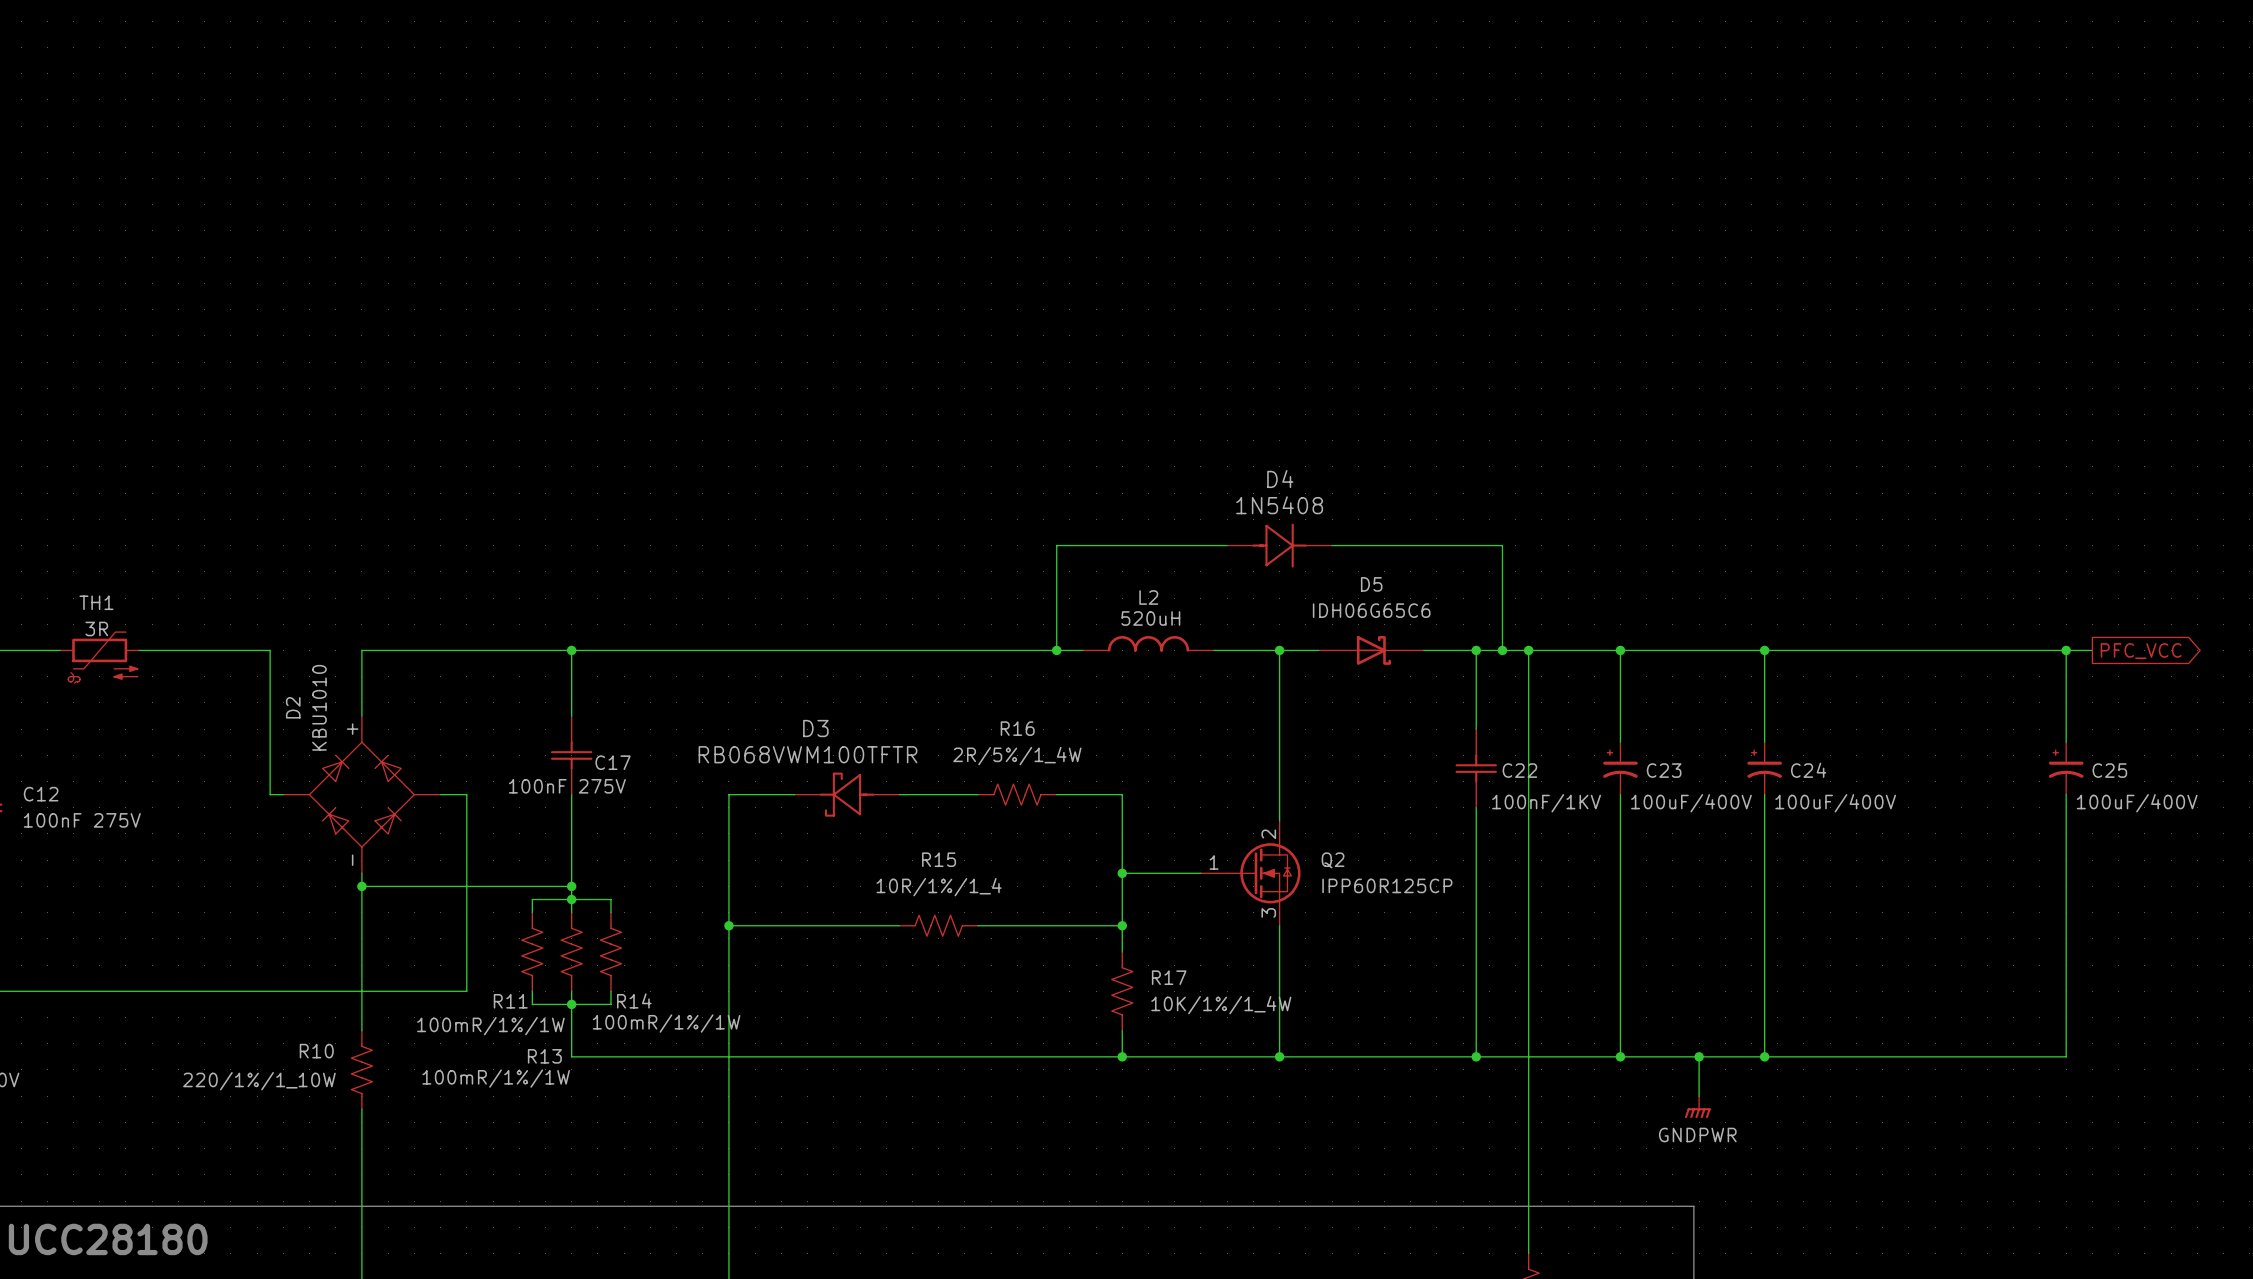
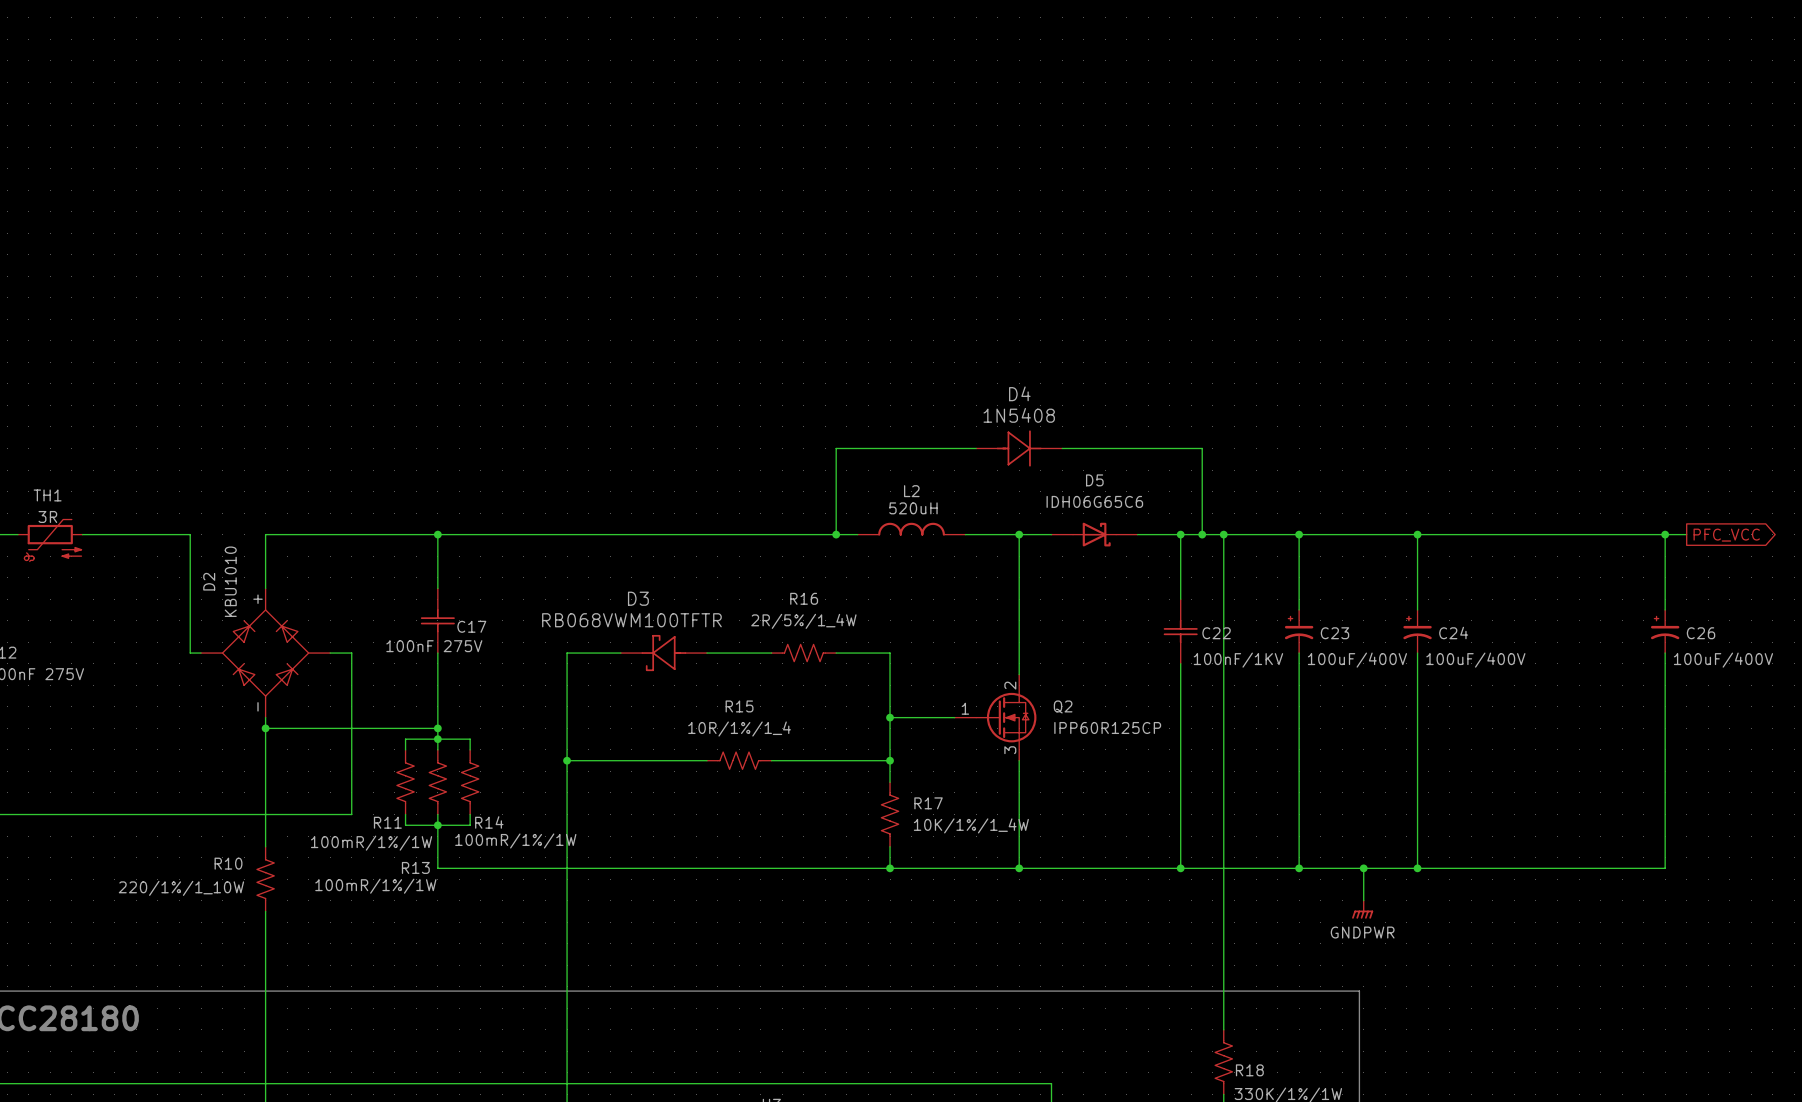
C25 name: C25 (2109, 770) -> C26 (1701, 633)

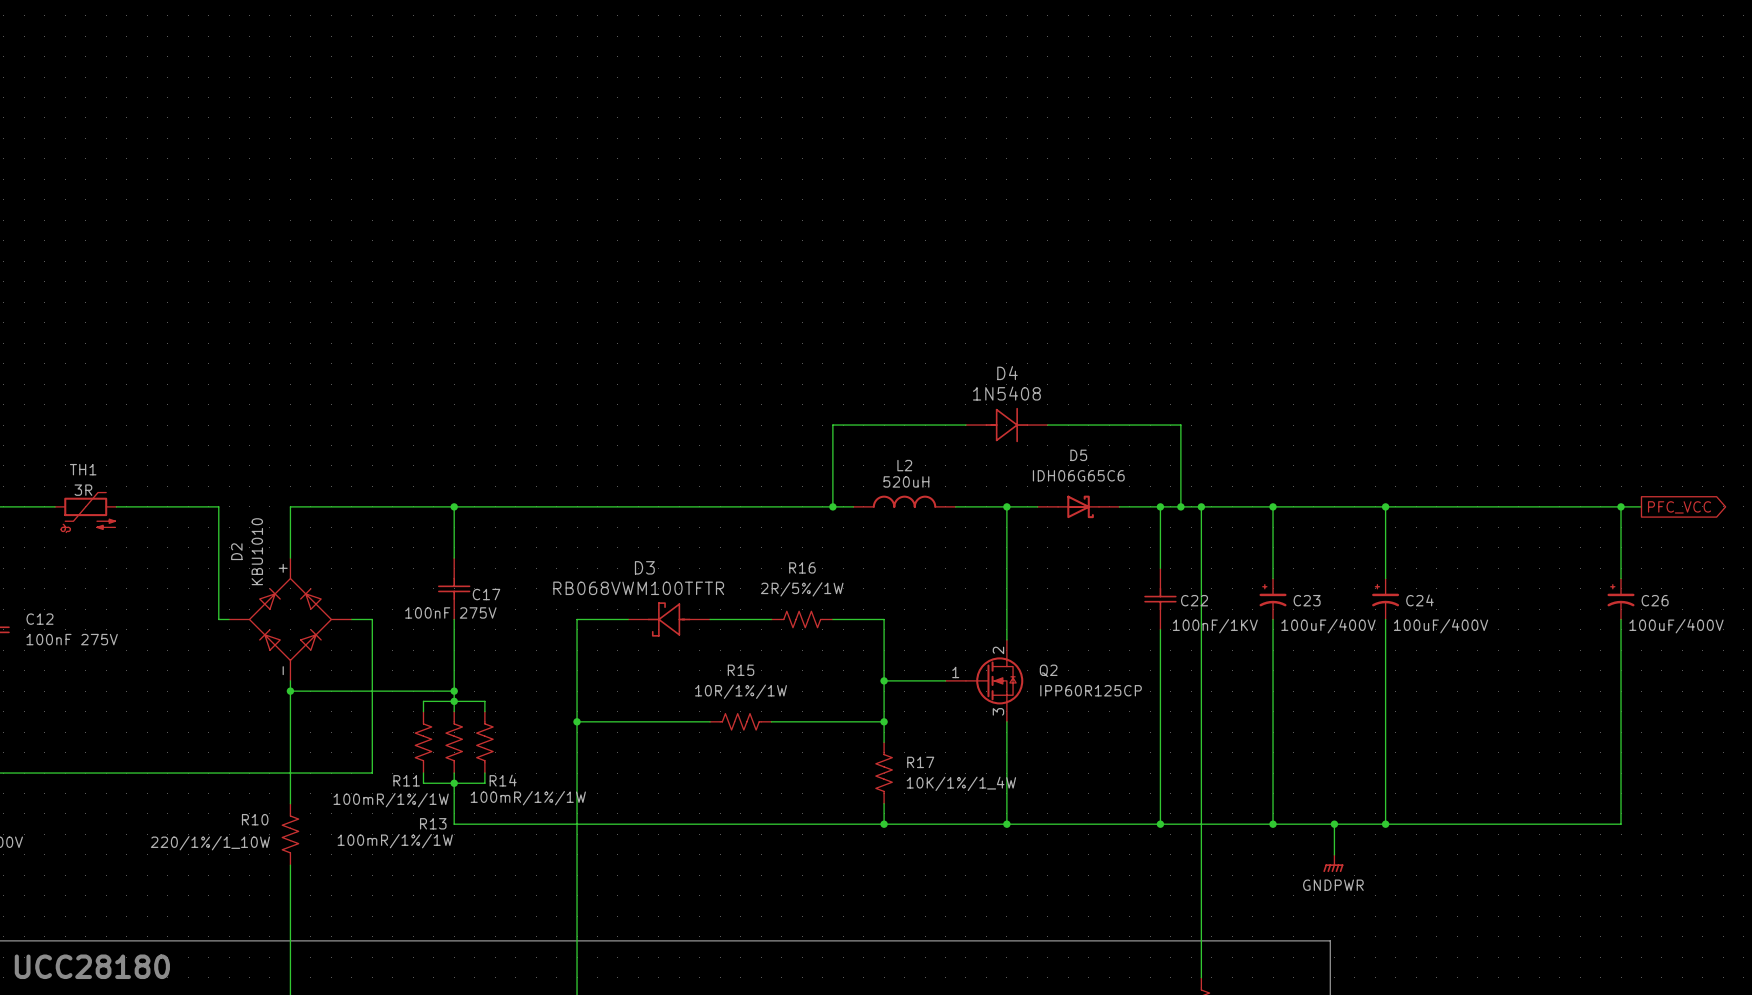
R16 value: 2R/5%/1_4W (803, 621) -> 2R/5%/1W (802, 589)
R15 value: 10R/1%/1_4 (739, 729) -> 10R/1%/1W (741, 691)

